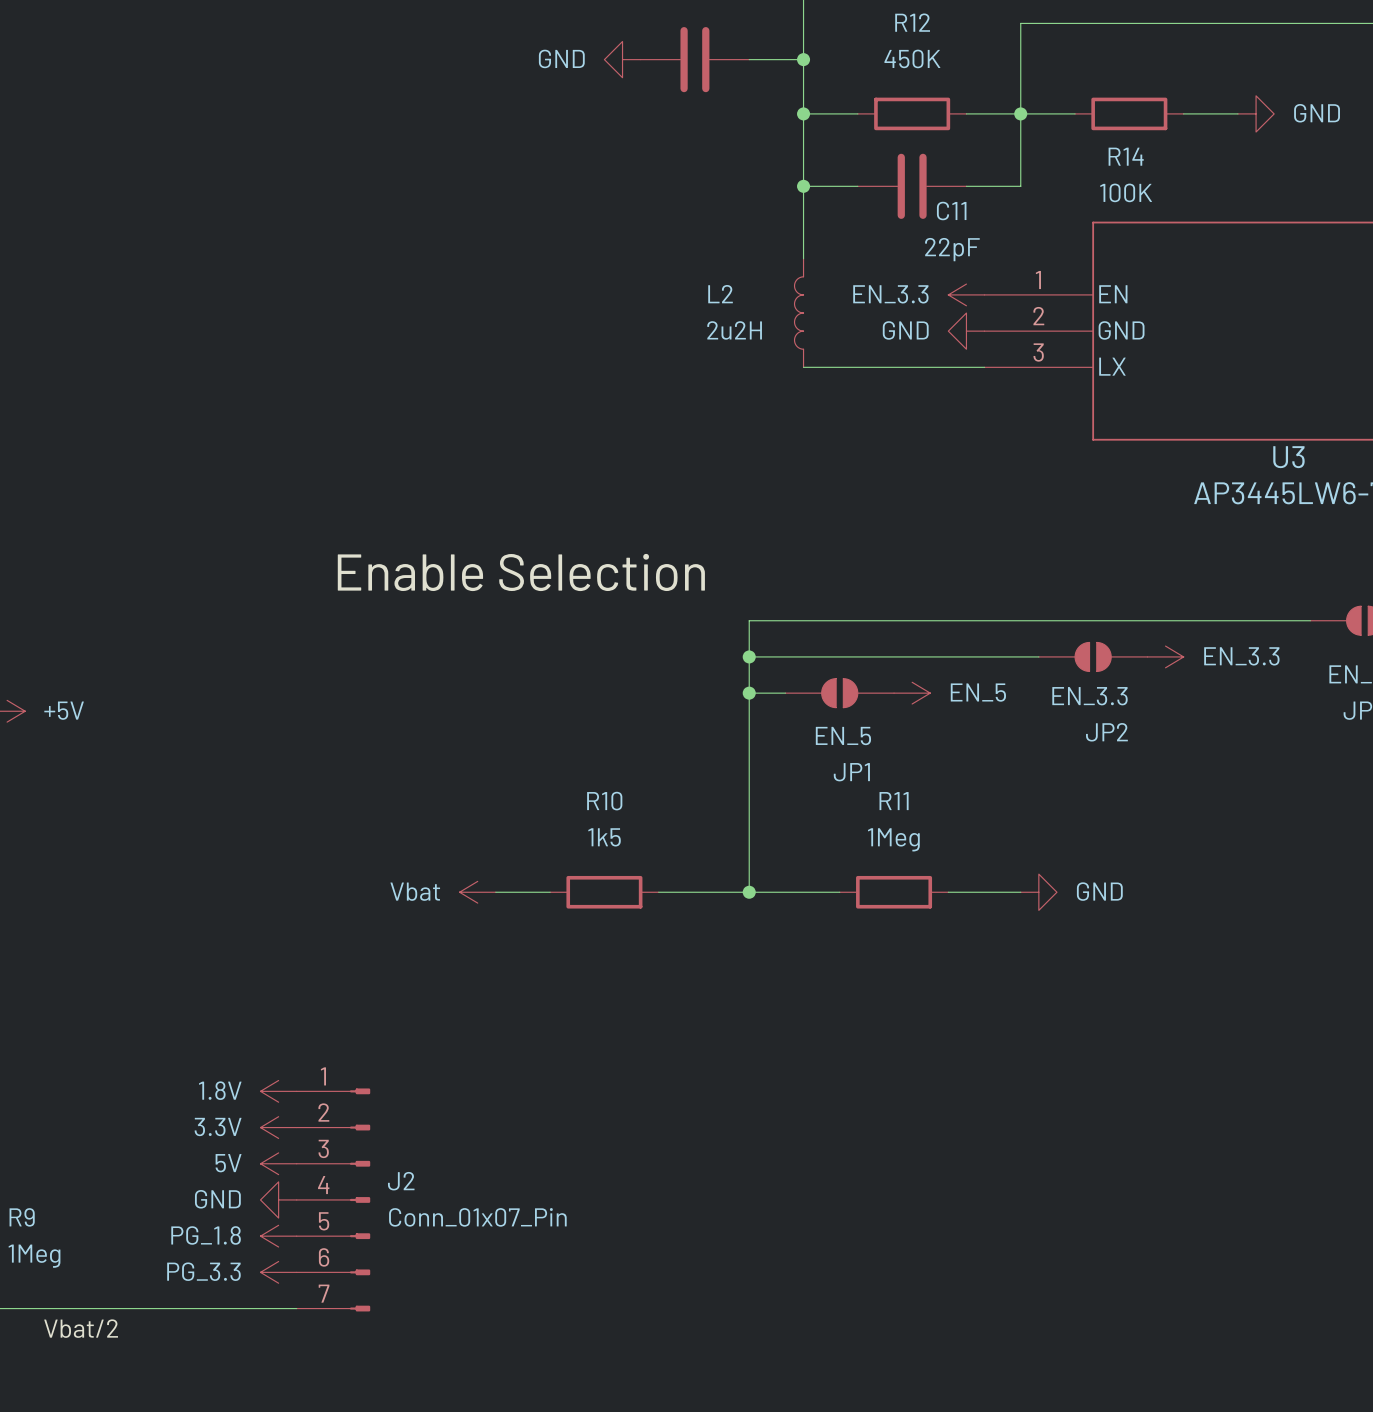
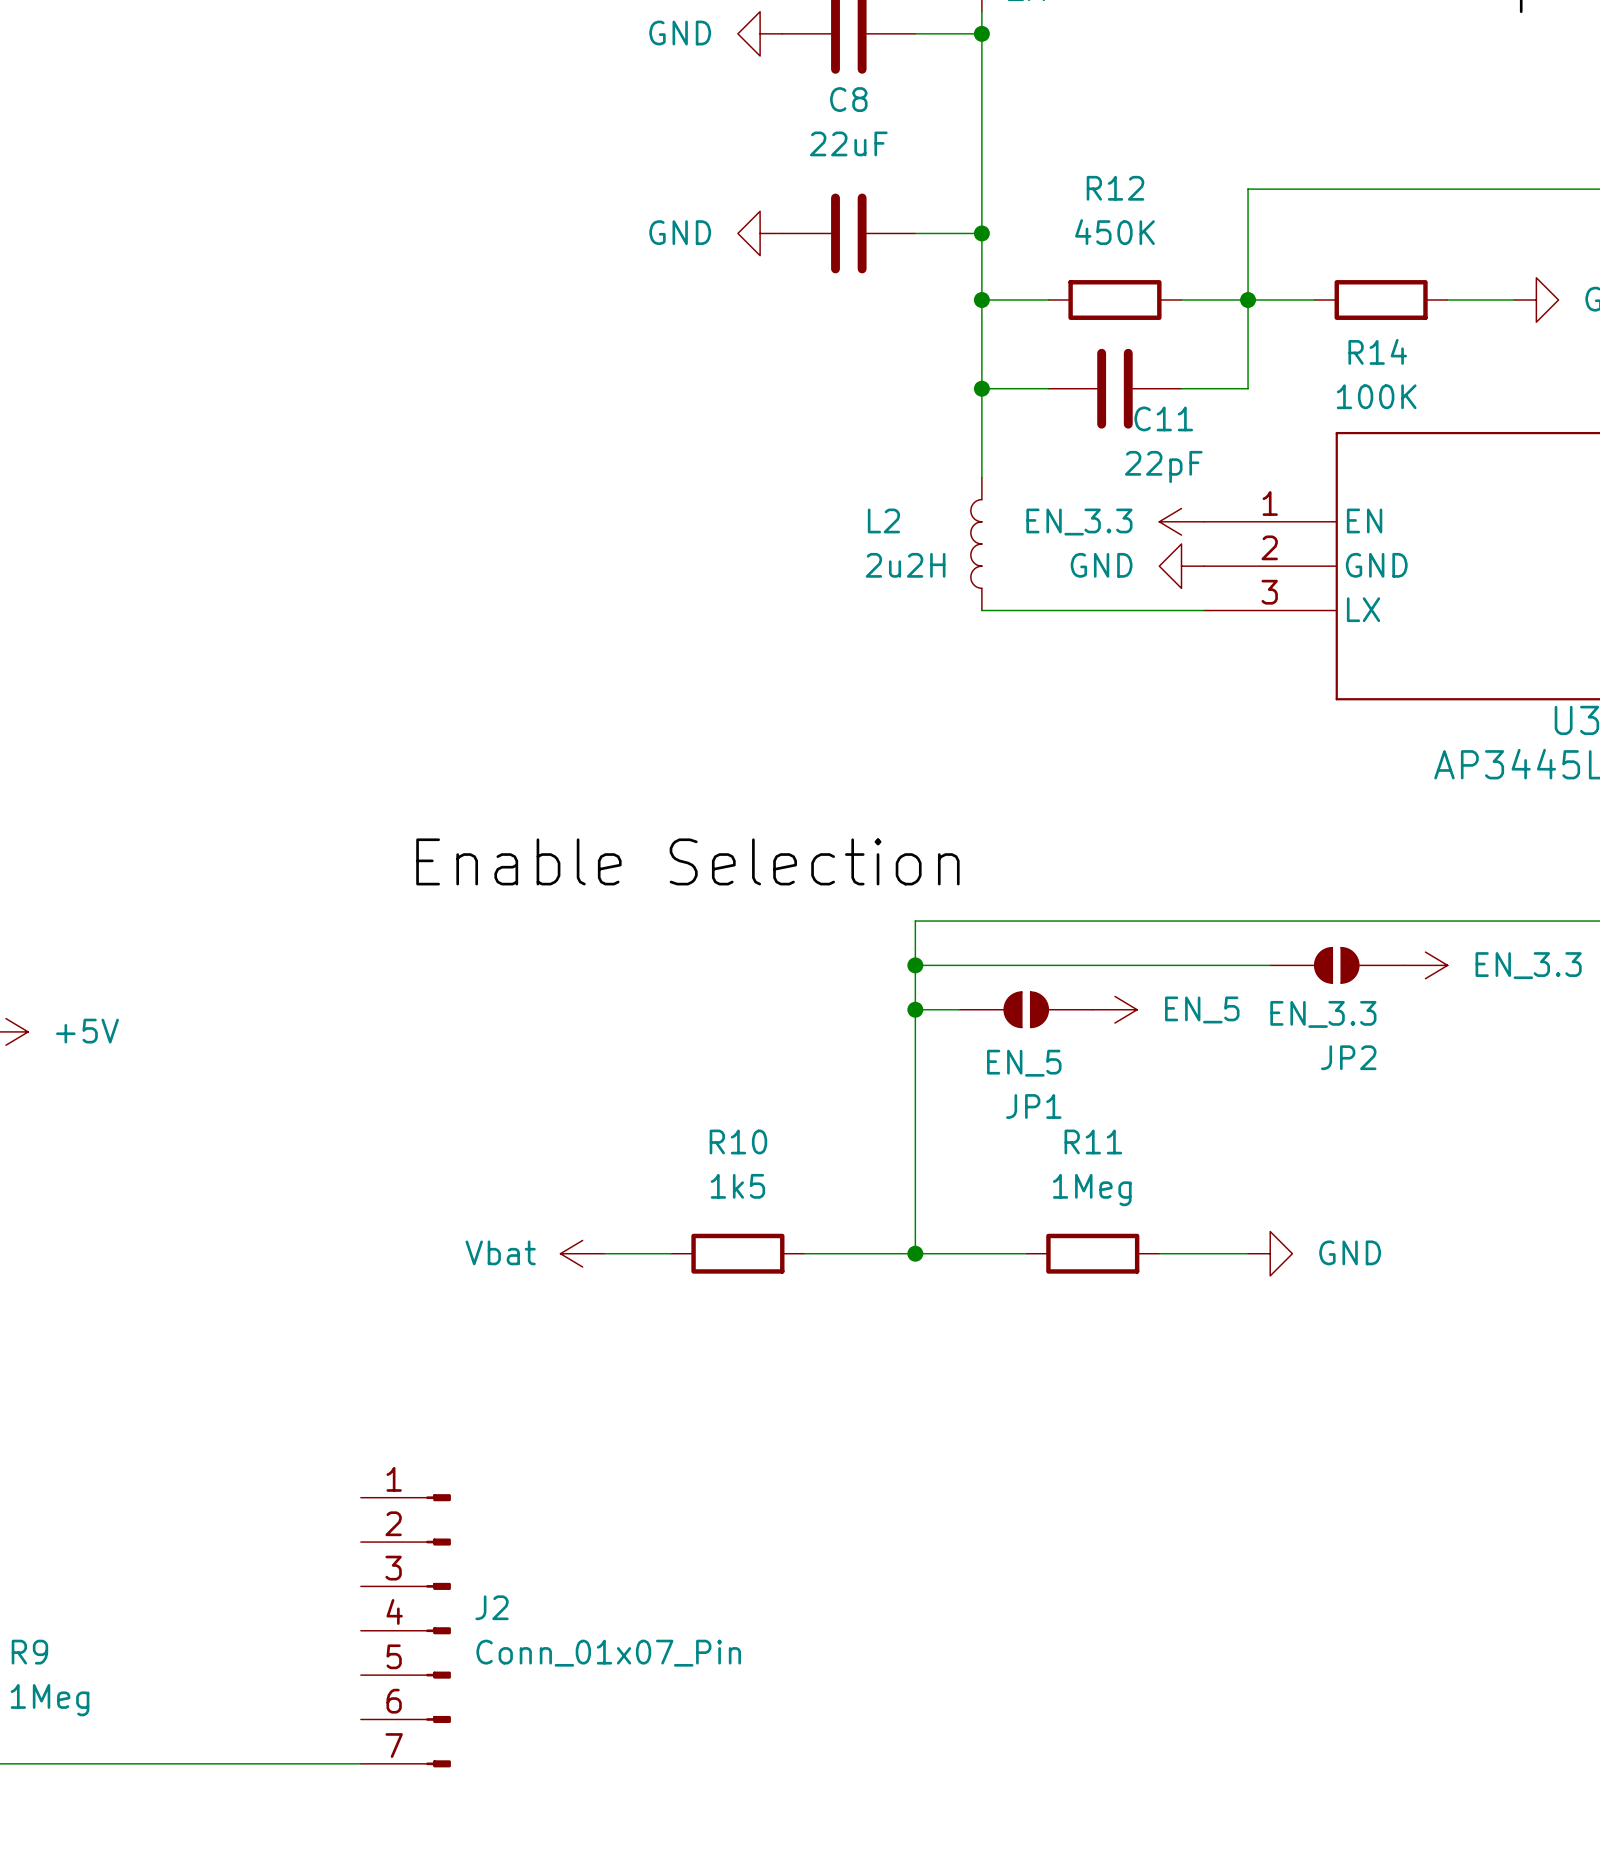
power symbol: 1.8V (278, 1091) -> none
power symbol: 3.3V (278, 1127) -> none
power symbol: 5V (278, 1163) -> none
power symbol: GND (278, 1199) -> none
power symbol: PG_1.8 (278, 1236) -> none
power symbol: PG_3.3 (278, 1272) -> none
label: Vbat/2 (81, 1328) -> none

